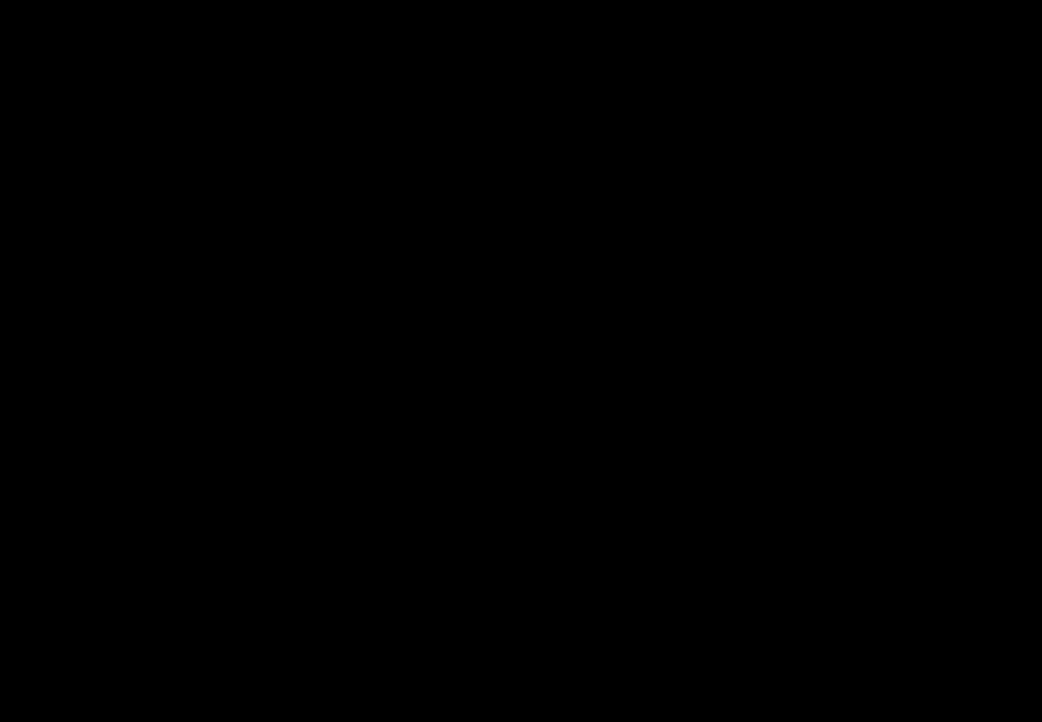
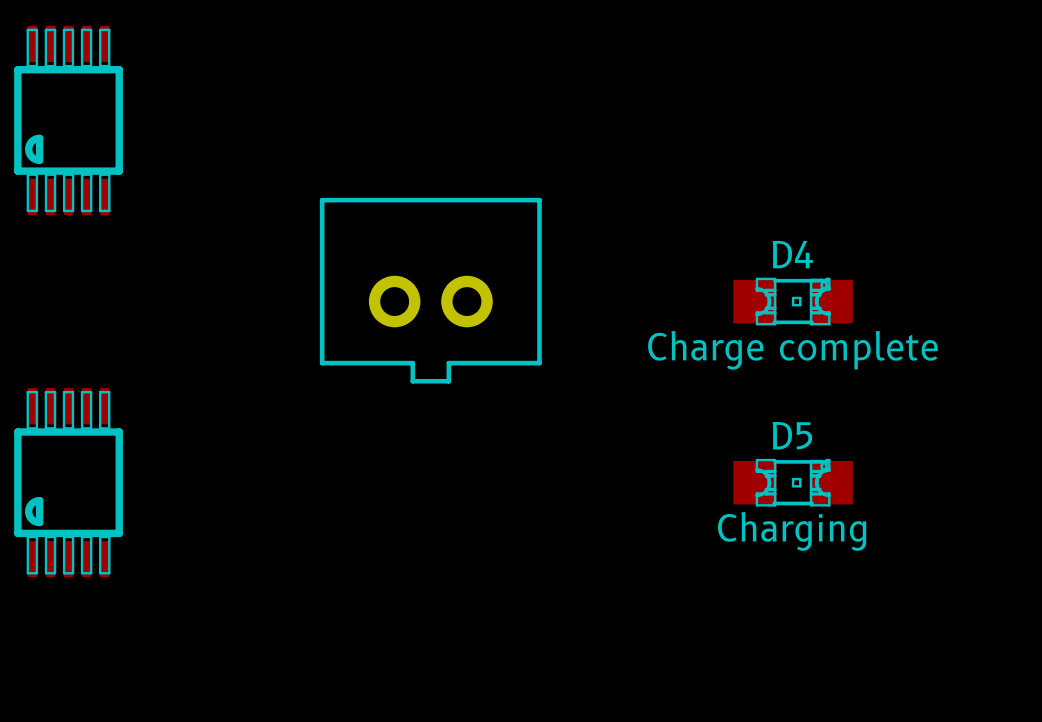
part: none -> (68, 120)
part: none -> (430, 290)
D4: none -> Charge complete (793, 301)
part: none -> (68, 482)
D5: none -> Charging (793, 482)

